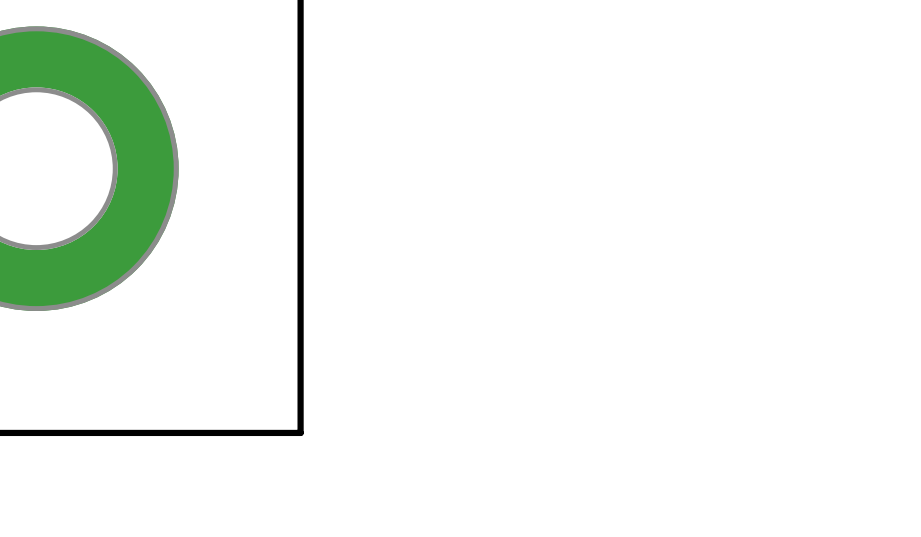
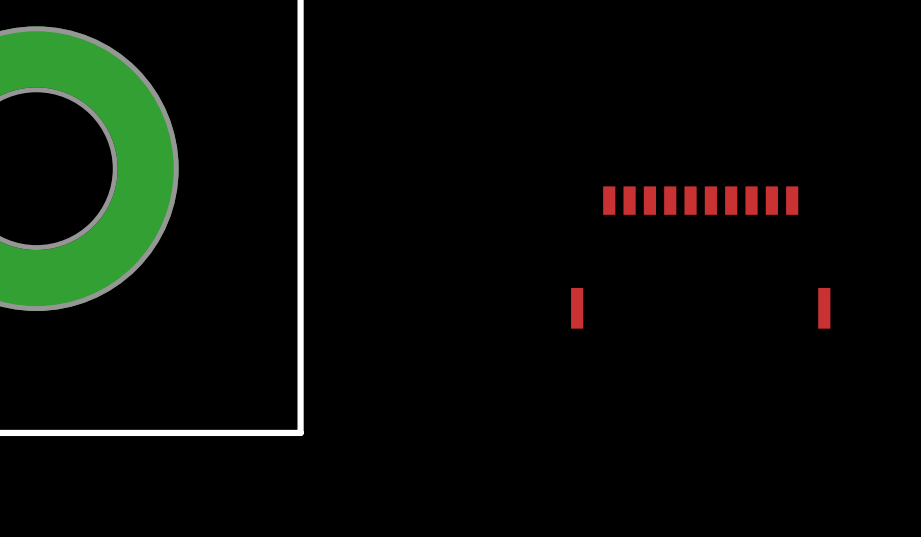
part: none -> (700, 257)

